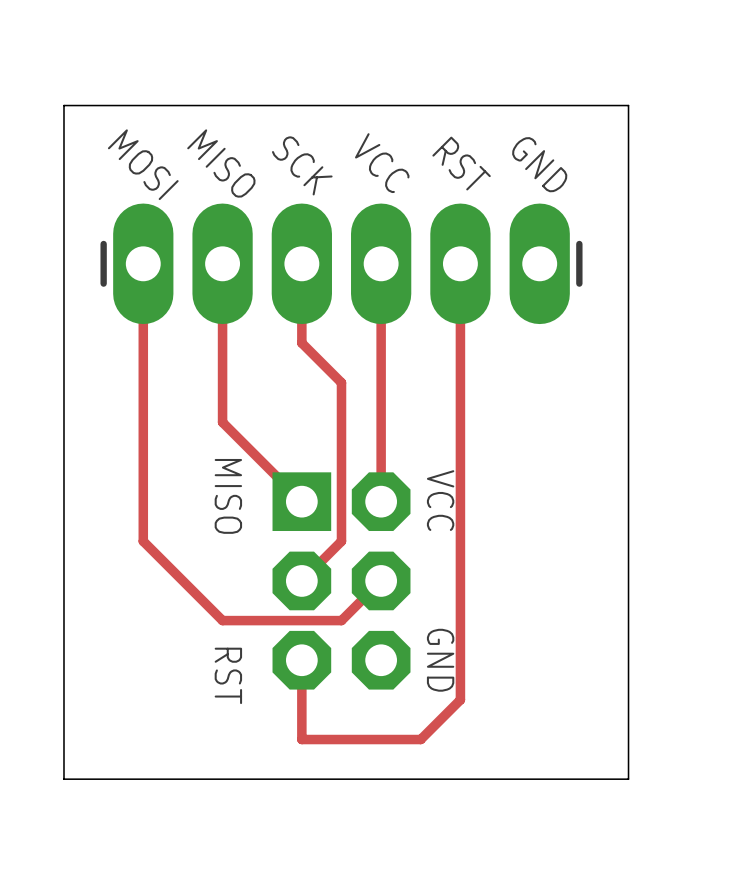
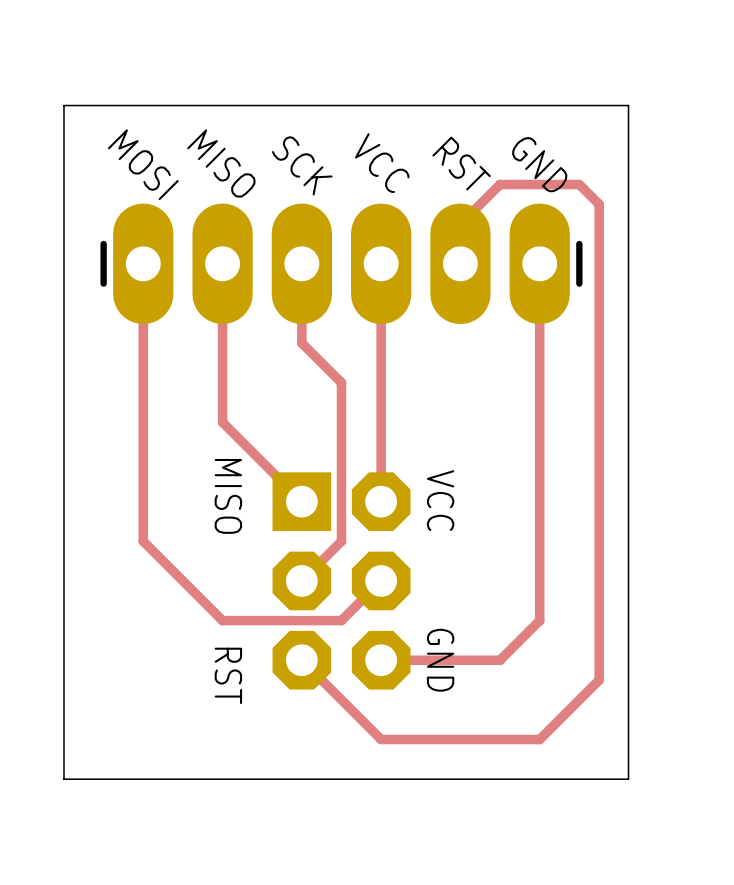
track: (460, 263) (460, 699) (420, 739) -> (460, 263) (460, 224) (500, 184) (579, 184) (599, 204) (599, 680) (539, 739) (420, 739)
track: none -> (539, 263) (539, 620) (500, 660) (381, 660)
track: (301, 660) (301, 739) (381, 739) -> (301, 660) (381, 739)

